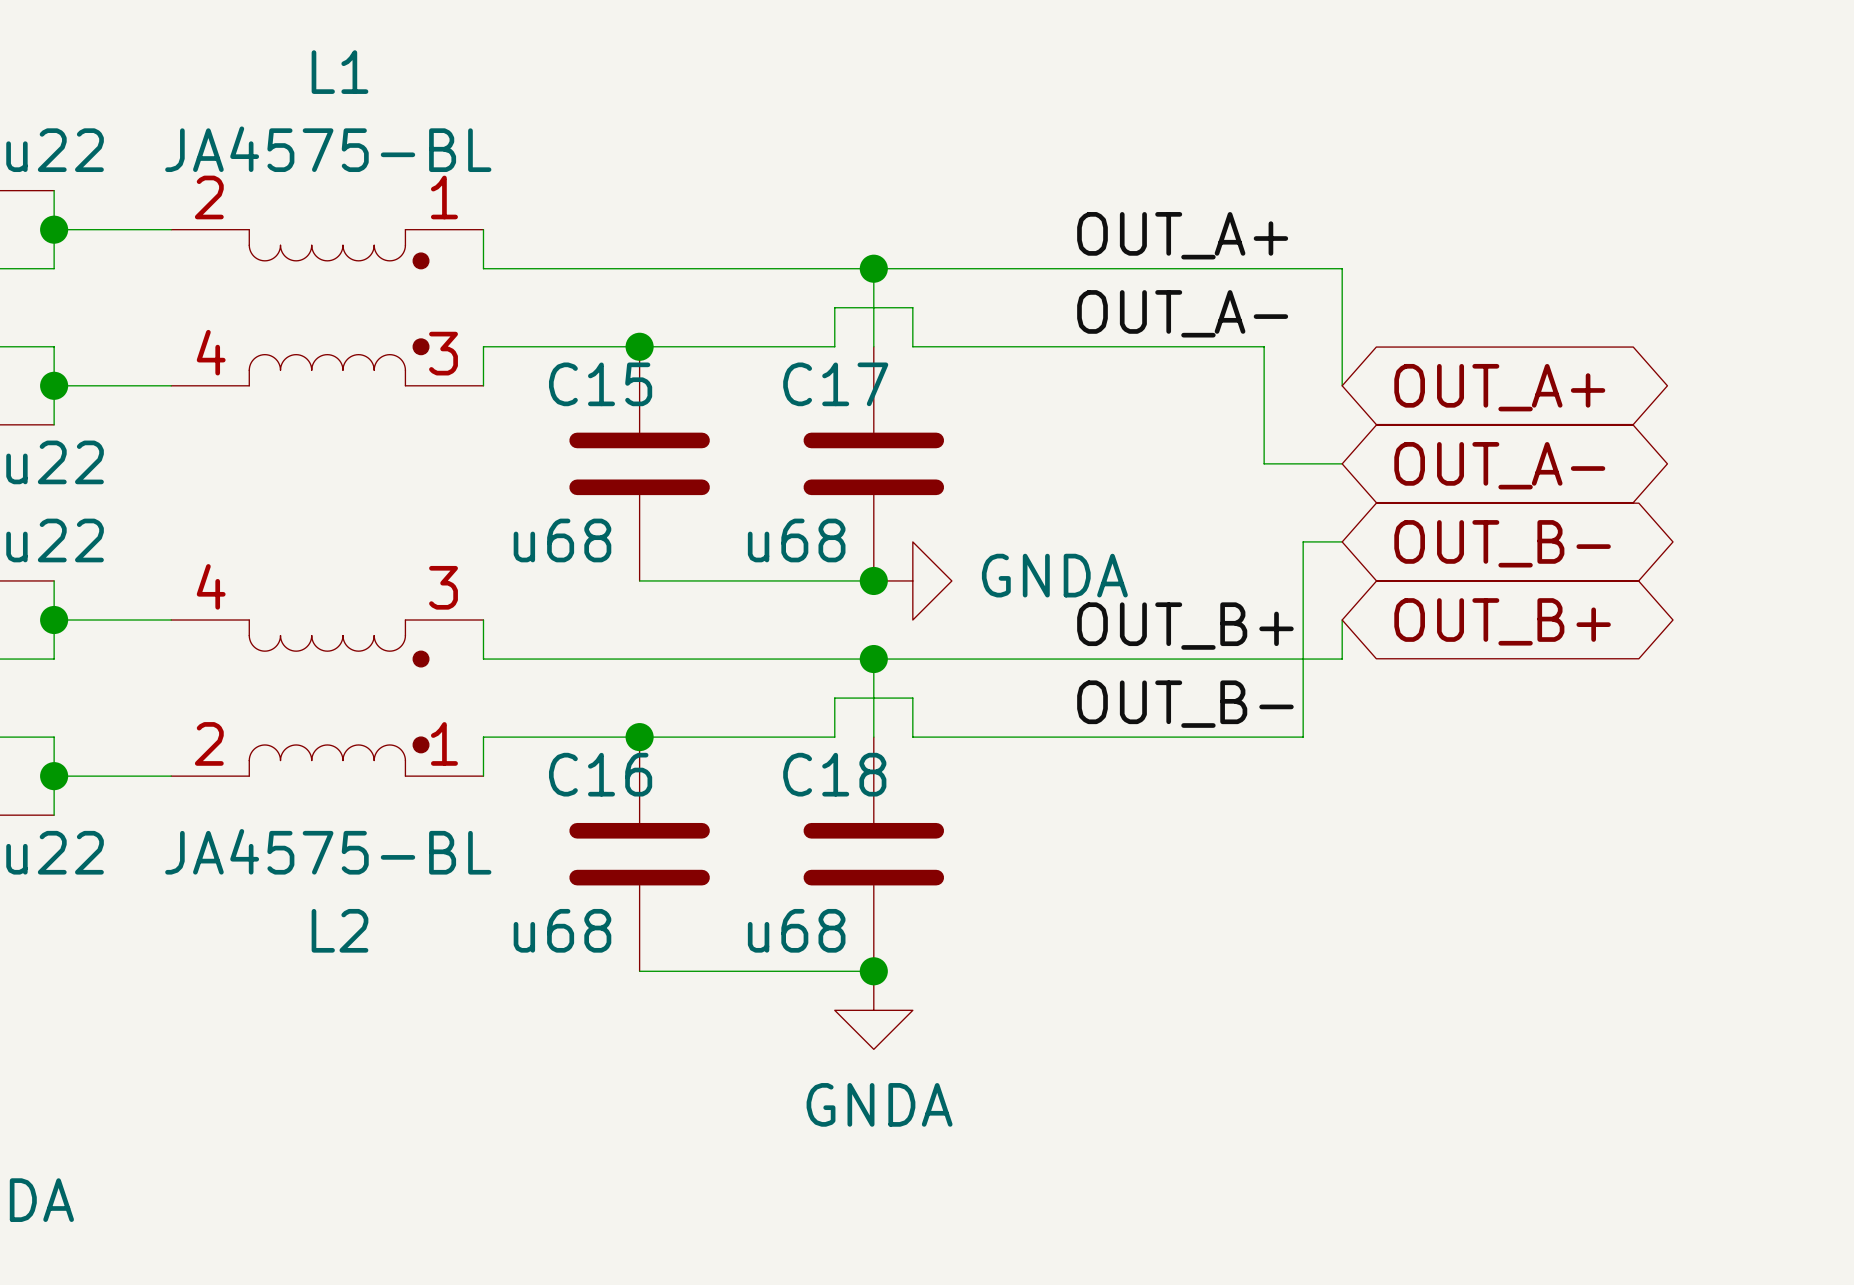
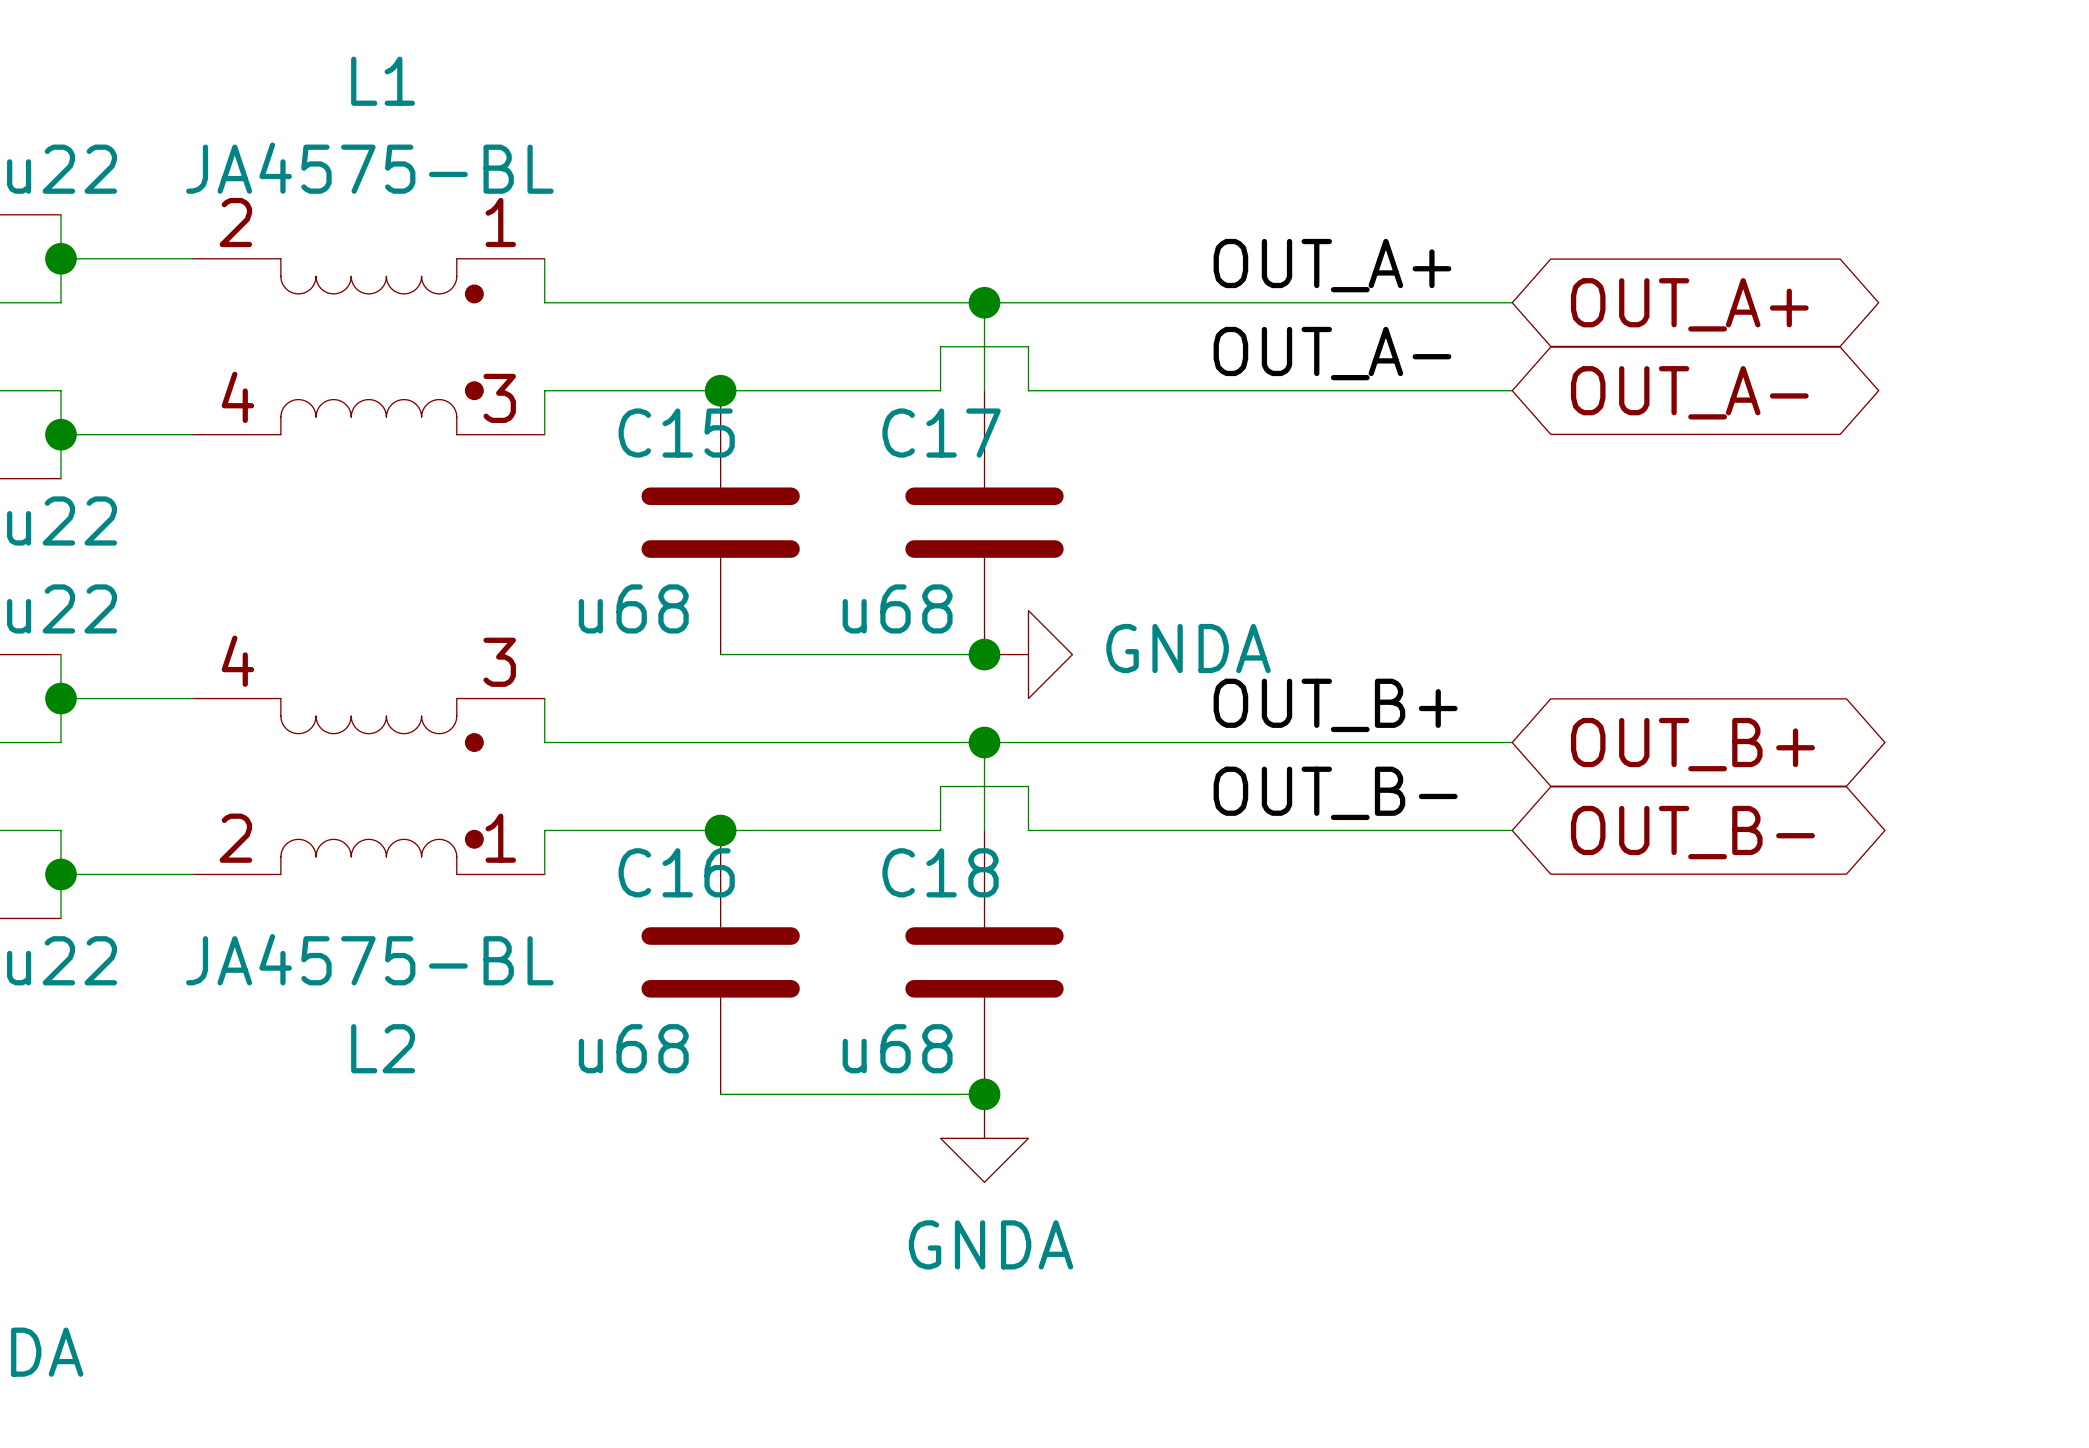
wire: (1342, 268) (1342, 385) -> none
wire: (1264, 346) (1264, 463) (1342, 463) -> (1424, 390) (1512, 390)
global label position: OUT_A+ (1499, 387) -> OUT_A+ (1689, 304)
global label position: OUT_A- (1499, 465) -> OUT_A- (1689, 392)
wire: (1342, 541) (1303, 541) (1303, 737) -> (1512, 830) (1468, 830)
global label position: OUT_B- (1502, 543) -> OUT_B- (1692, 832)
wire: (1342, 620) (1342, 659) -> none
global label position: OUT_B+ (1502, 621) -> OUT_B+ (1692, 744)

